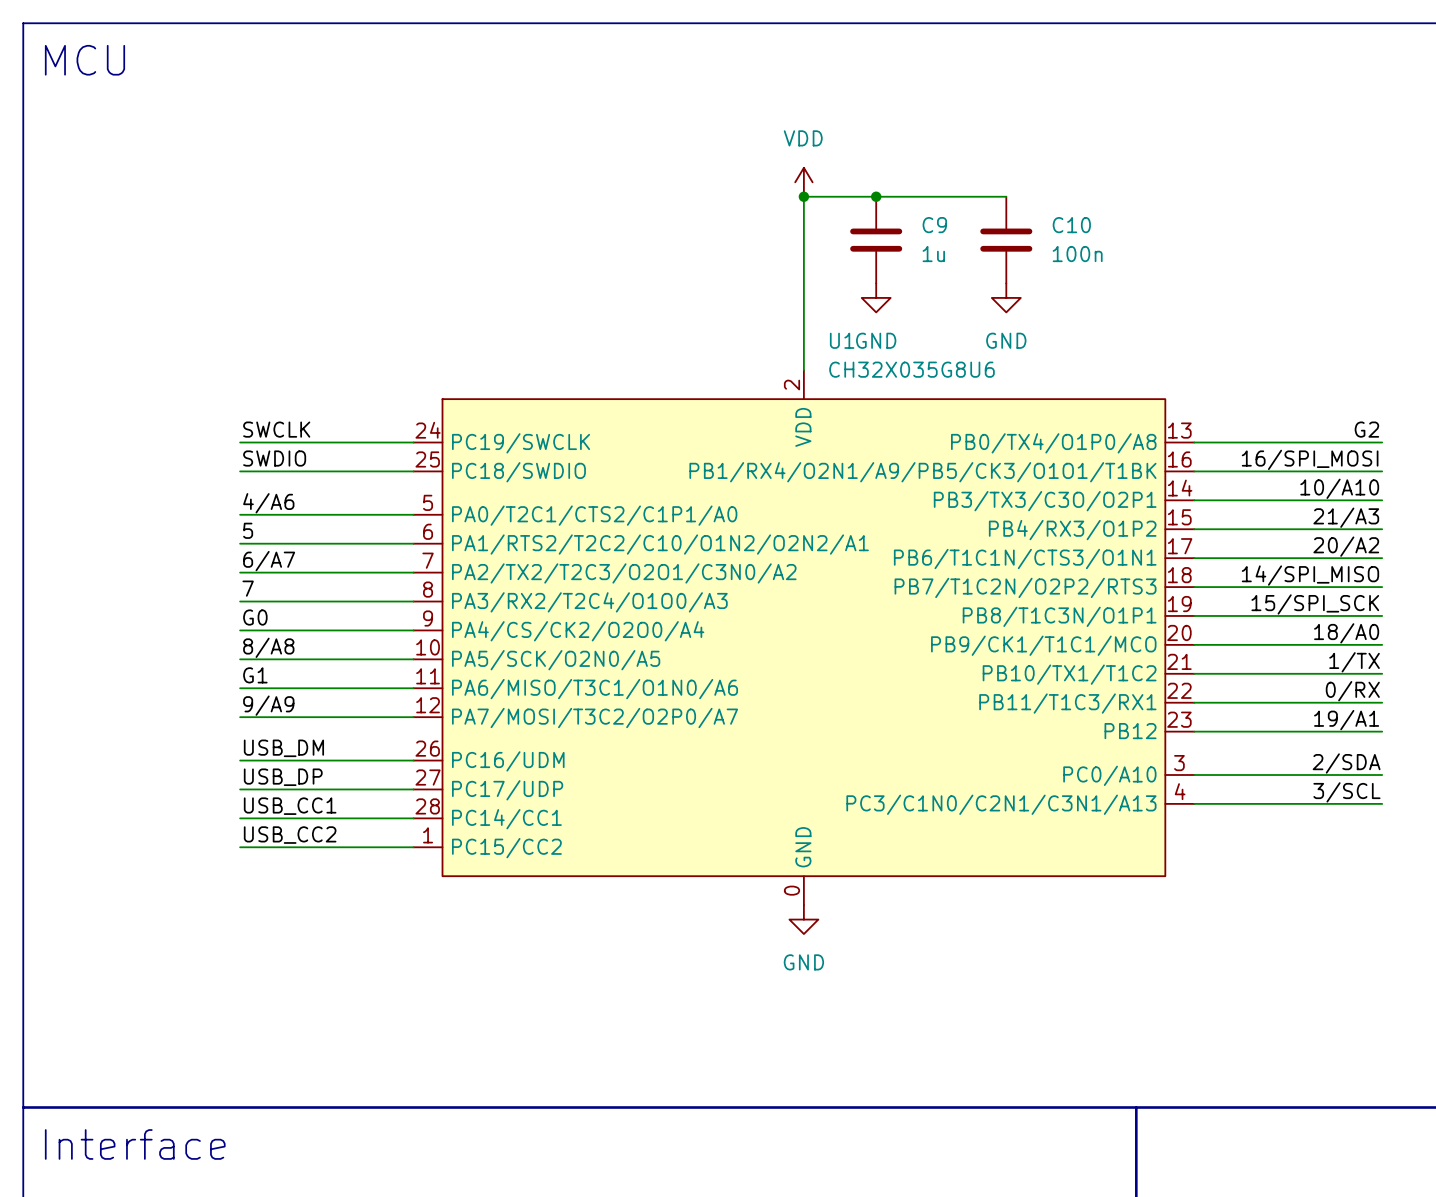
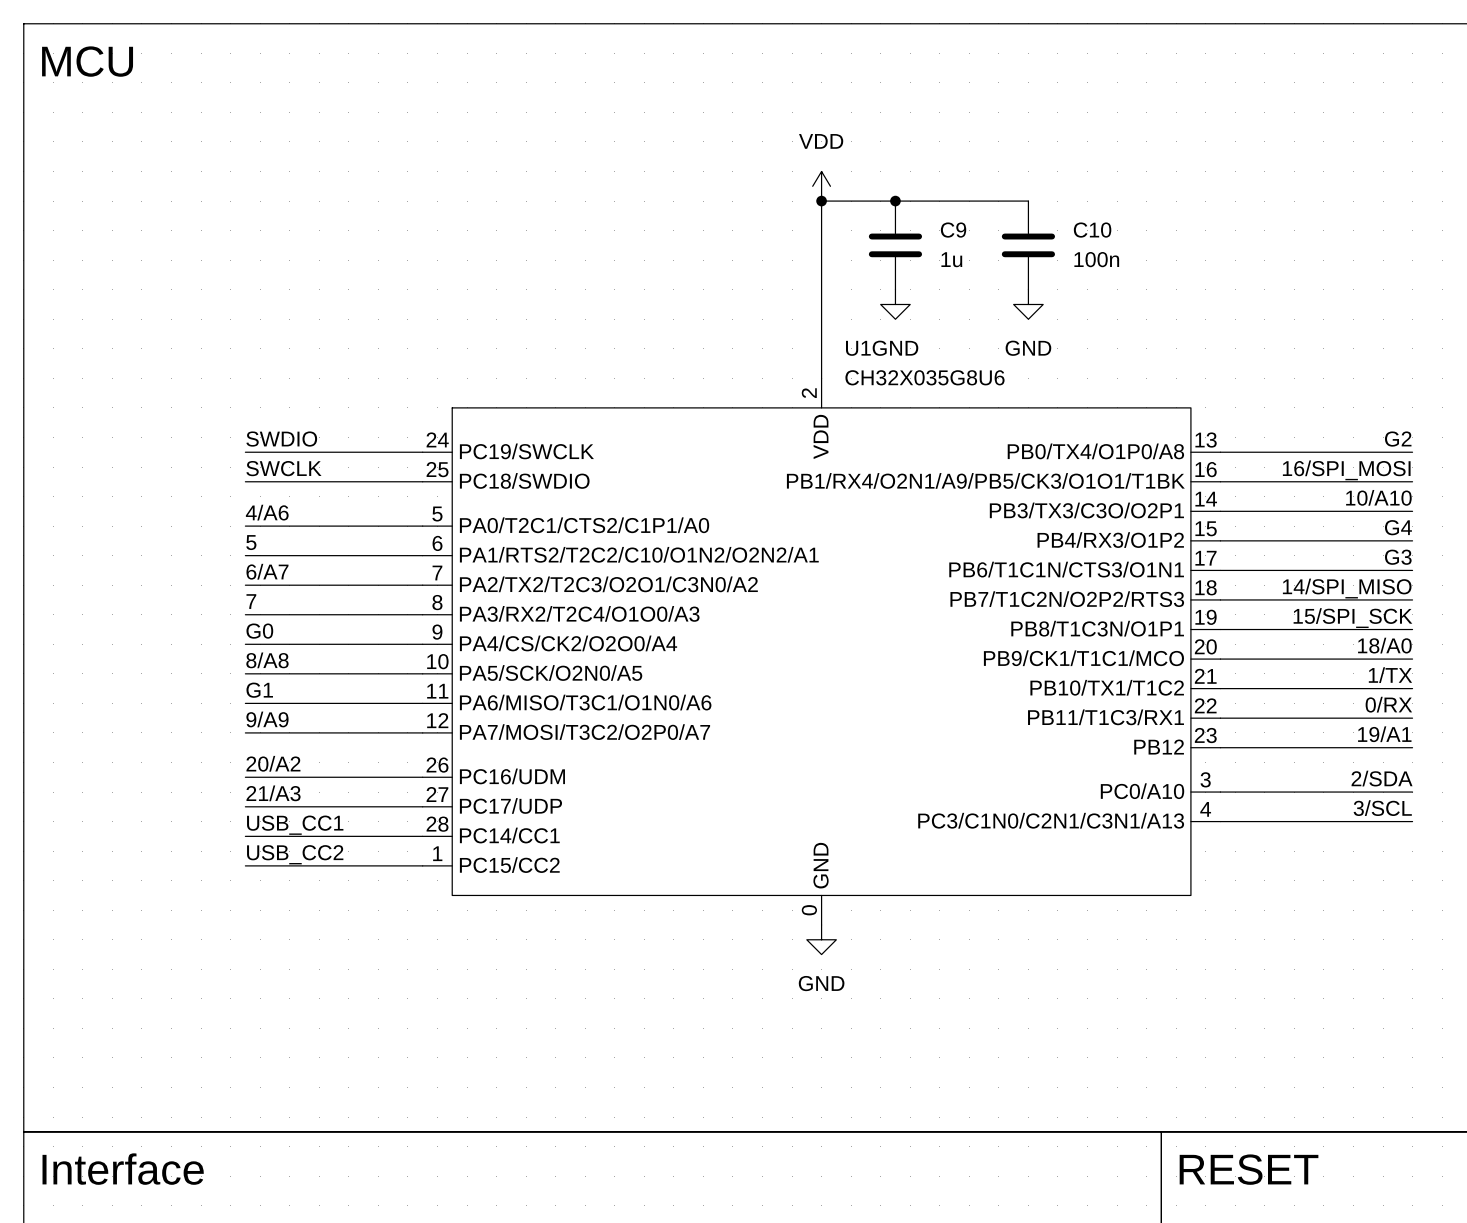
label: SWCLK (276, 429) -> SWDIO (281, 439)
label: SWDIO (274, 458) -> SWCLK (283, 468)
label: 21/A3 (1346, 517) -> G4 (1398, 527)
label: 20/A2 (1346, 546) -> G3 (1398, 557)
label: USB_DM (283, 748) -> 20/A2 (273, 763)
label: USB_DP (283, 777) -> 21/A3 (273, 793)
text: none -> RESET (1249, 1169)

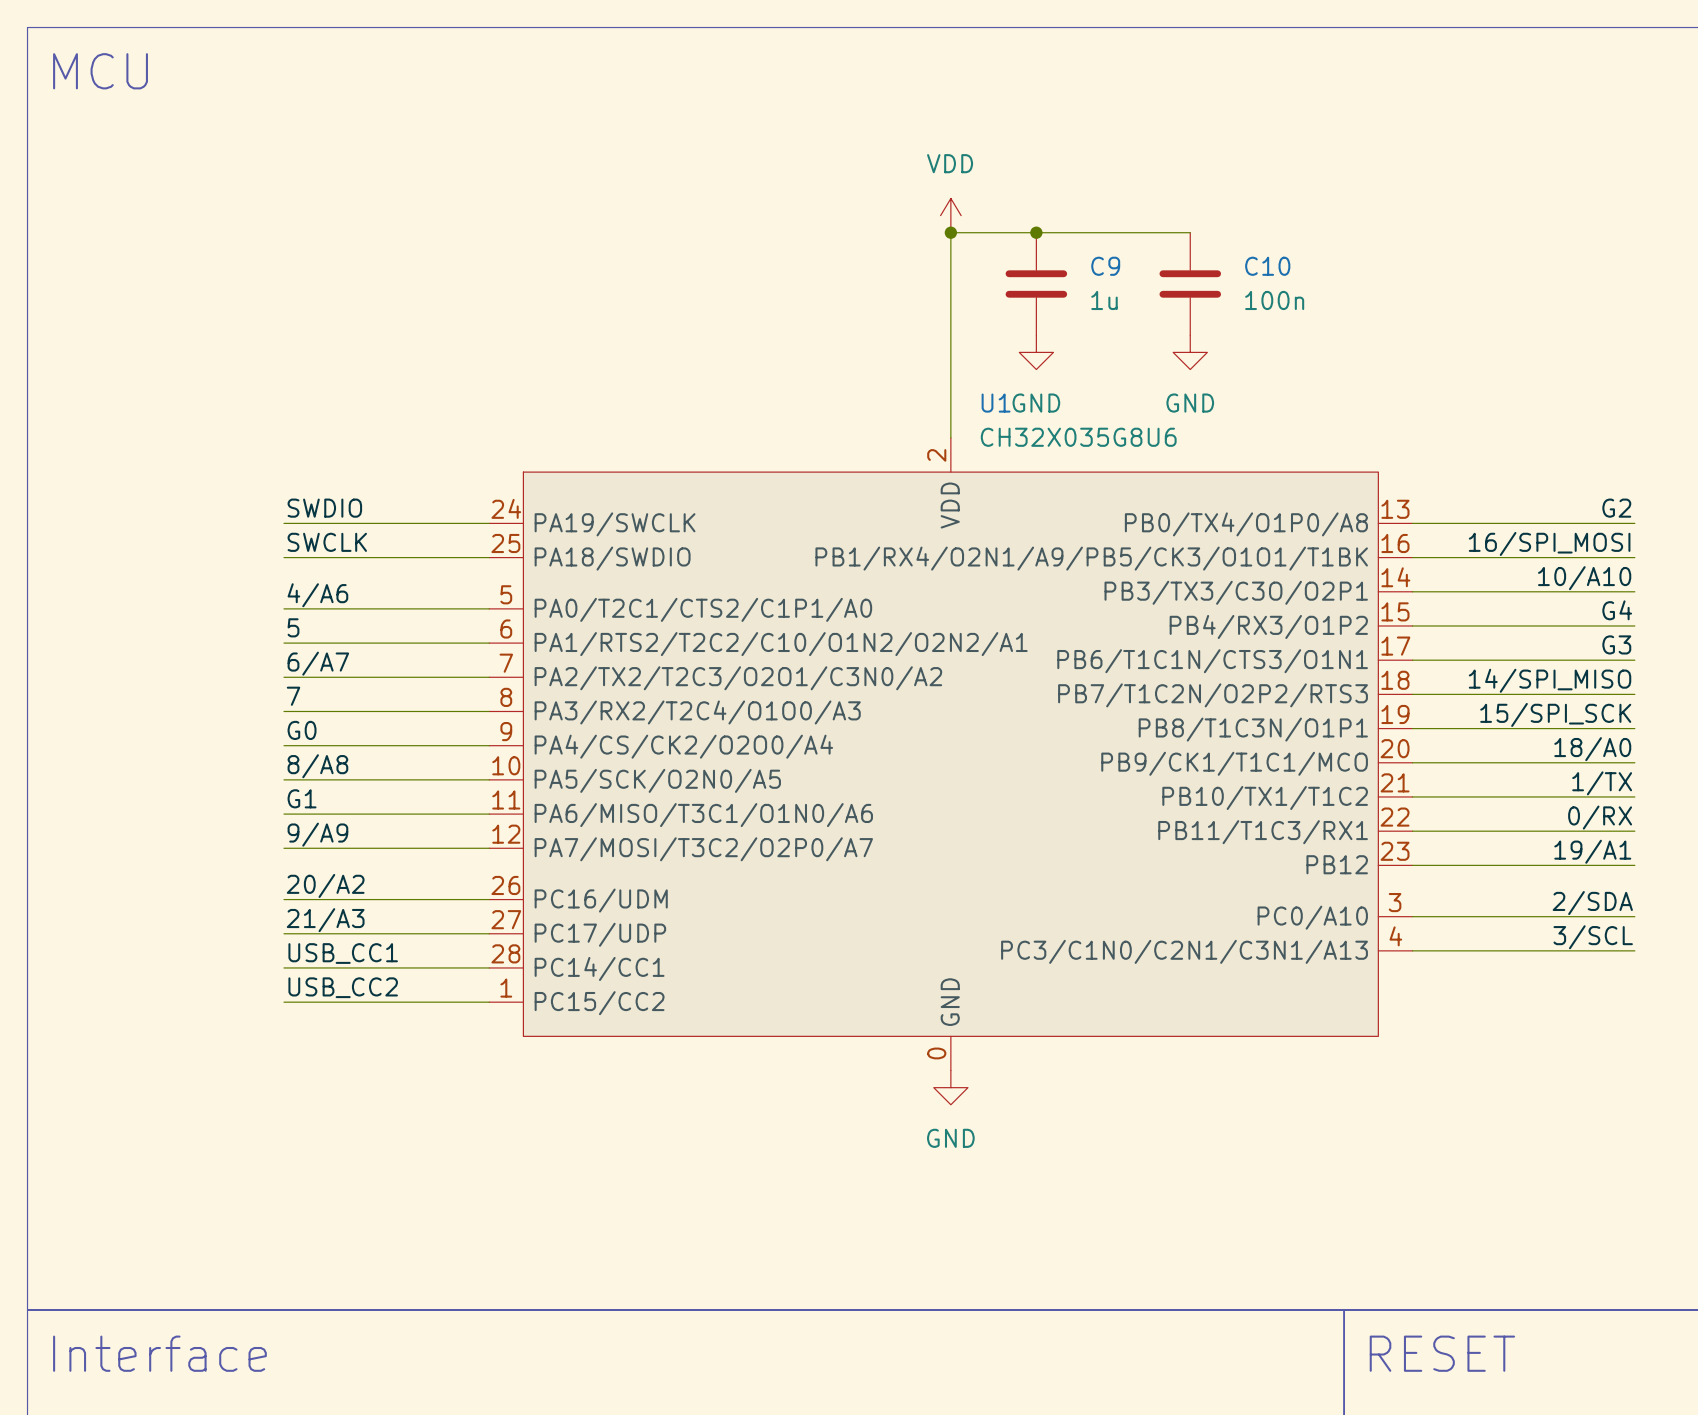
U1 pin name: PC19/SWCLK (526, 451) -> PA19/SWCLK (615, 524)
U1 pin name: PC18/SWDIO (524, 480) -> PA18/SWDIO (612, 558)

